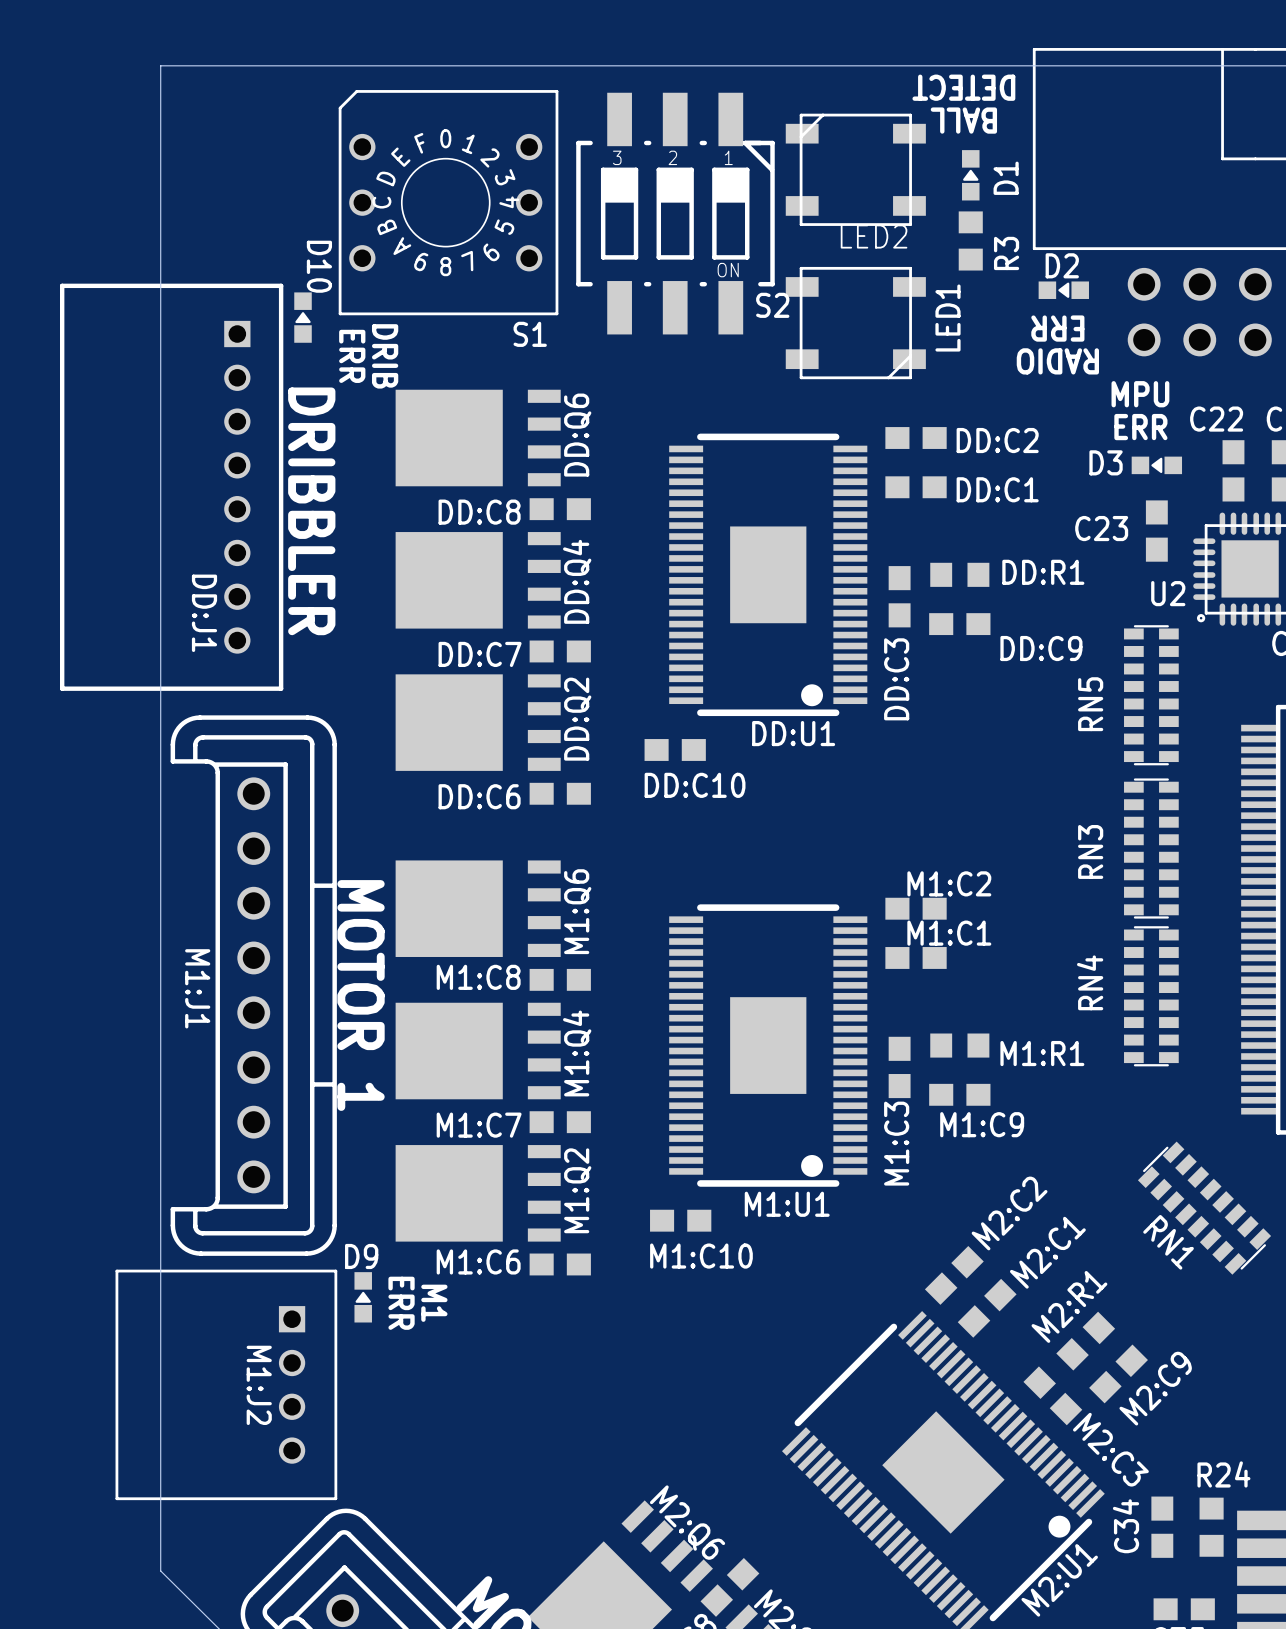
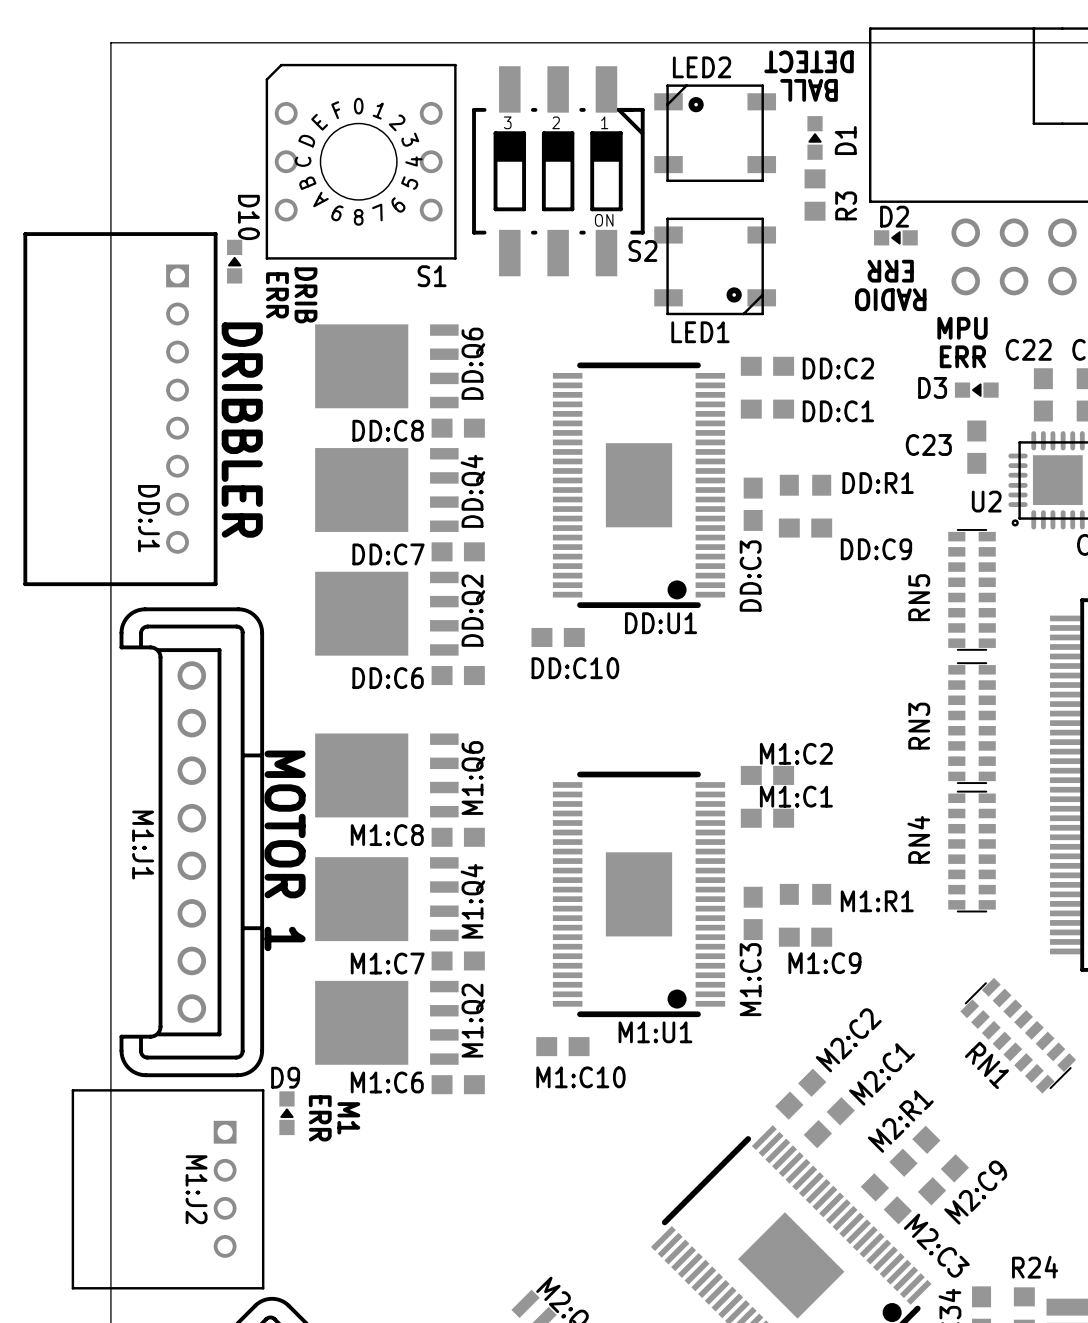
LED2 footprint: [785, 113, 926, 226] -> [654, 84, 777, 182]
LED2 name position: LED2 (874, 236) -> LED2 (702, 67)
LED1 footprint: [785, 266, 926, 380] -> [654, 217, 777, 316]
LED1 name position: LED1 (947, 318) -> LED1 (700, 332)

